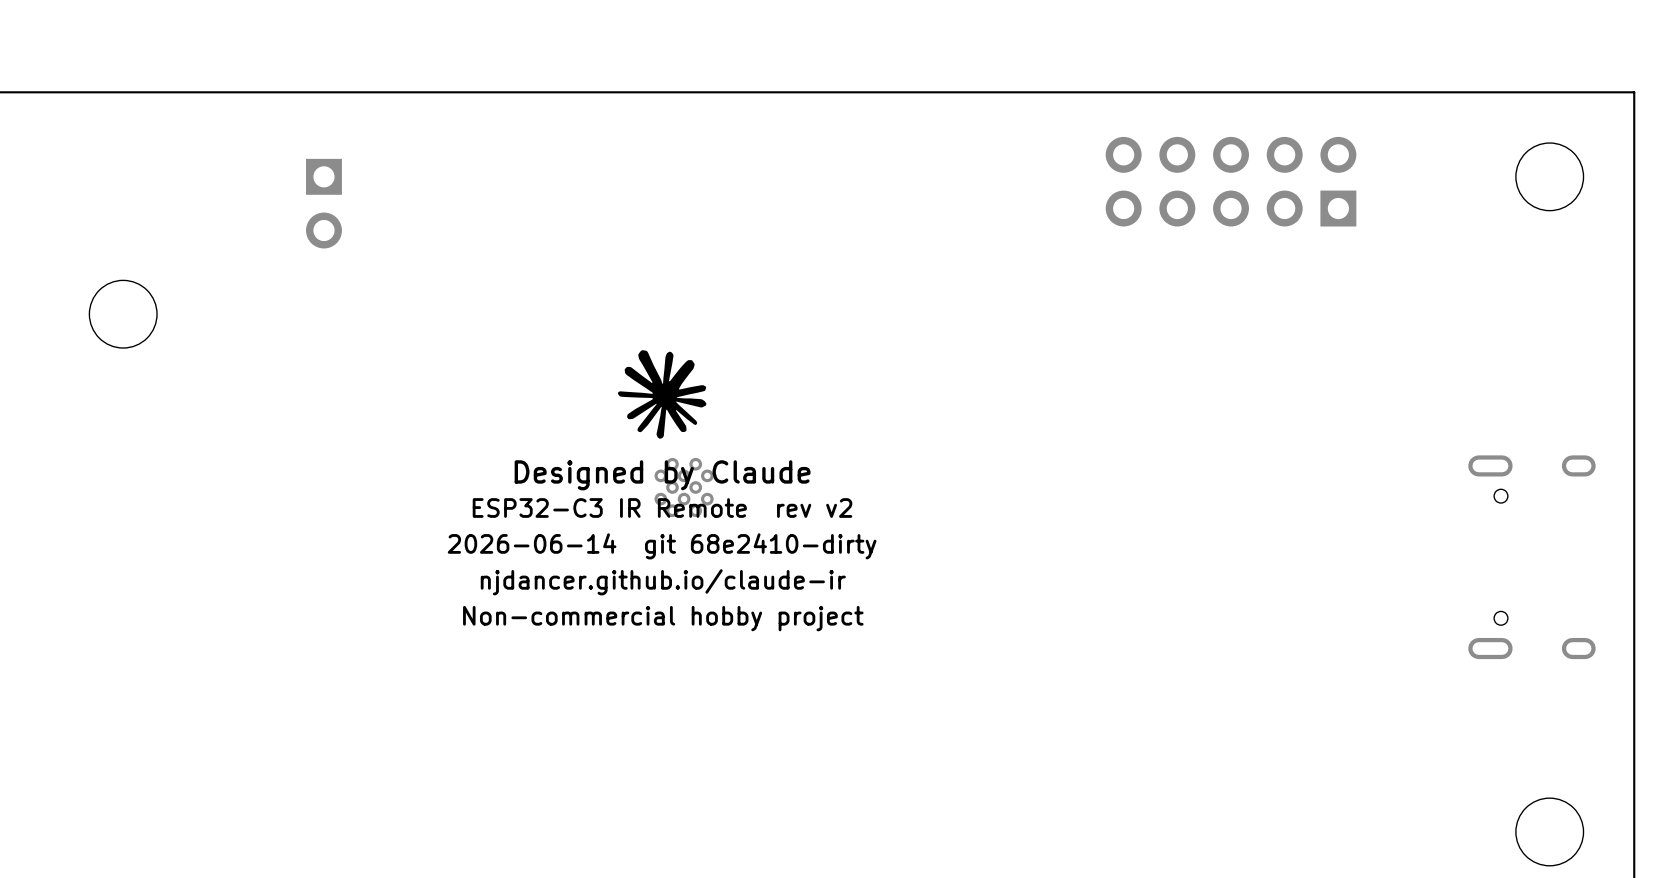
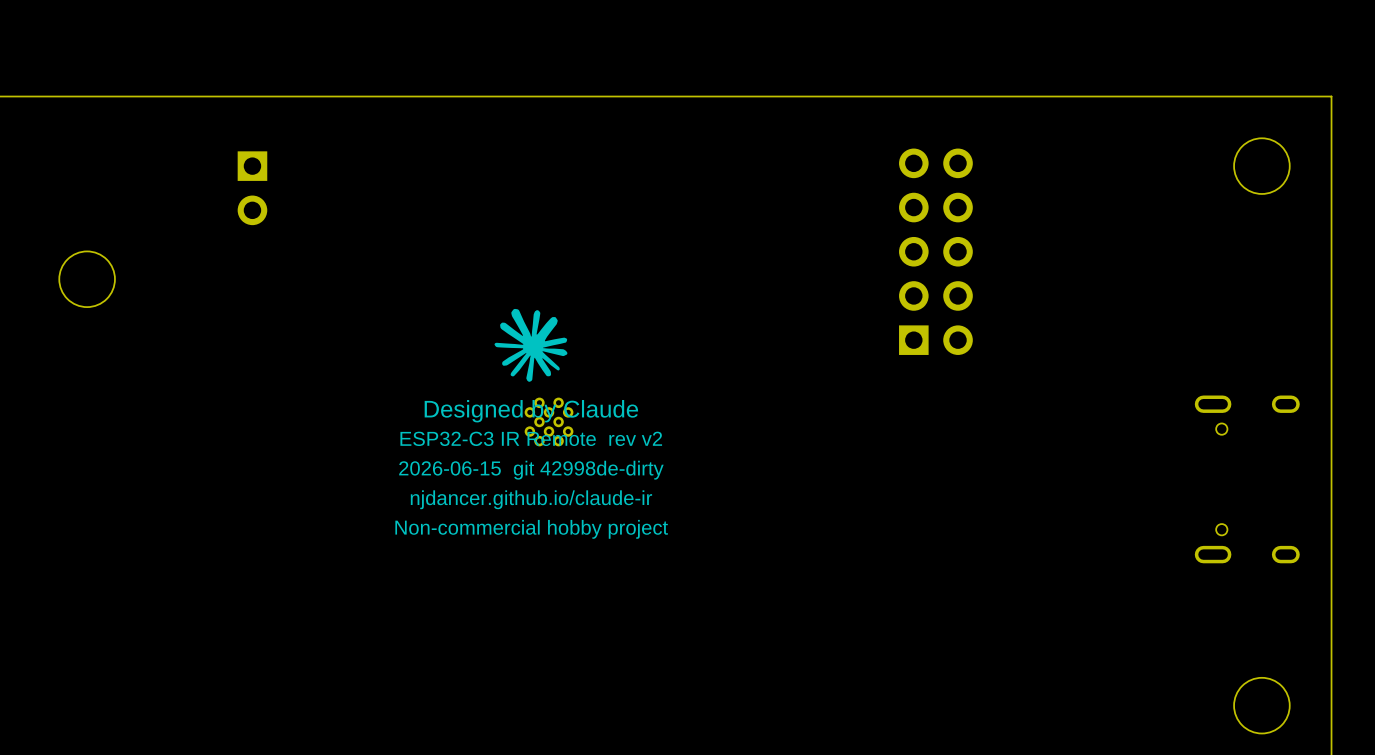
part rotation: 0° (1231, 181) -> 90° clockwise (935, 251)
text: 2026-06-14 git 68e2410-dirty (662, 546) -> 2026-06-15 git 42998de-dirty (531, 470)

